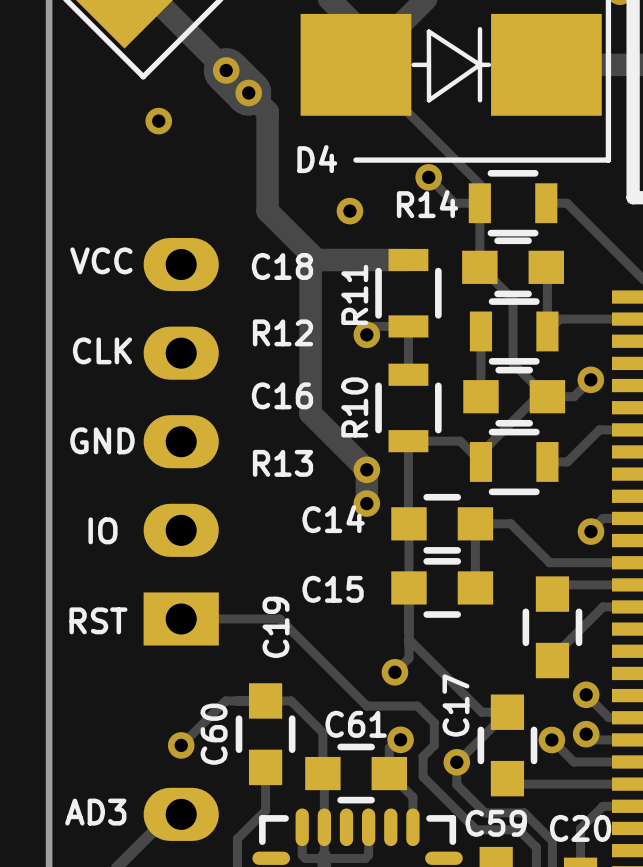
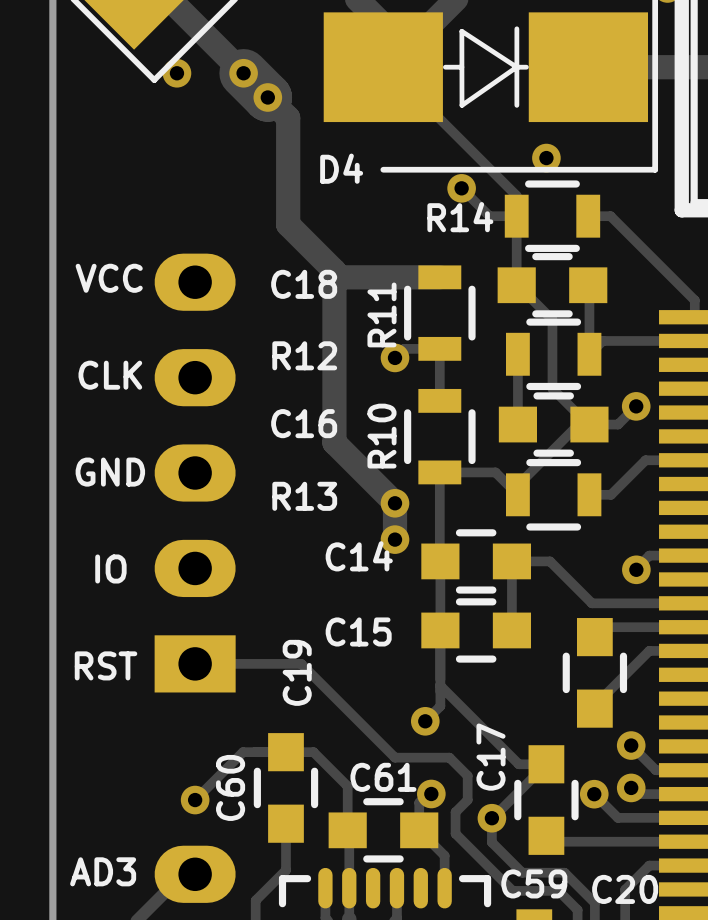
via position: (158, 121) -> (176, 73)
via: none -> (546, 158)
via: (349, 211) -> none

